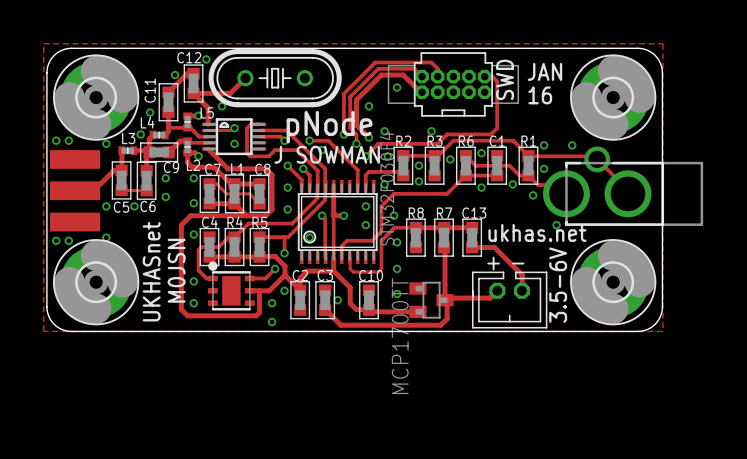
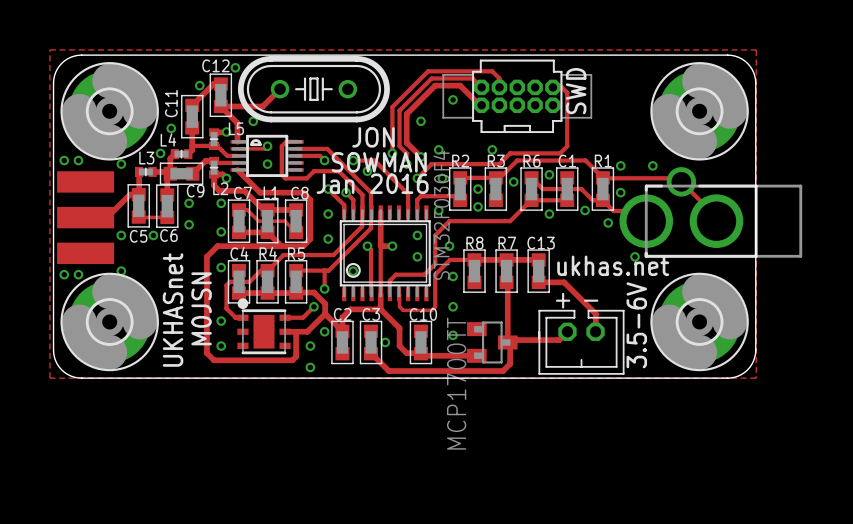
text: JAN (544, 71) -> none
text: 16 (540, 95) -> none
text: none -> JON (373, 137)
text: pNode (329, 127) -> none
text: none -> SOWMAN (379, 162)
text: J SOWMAN (327, 154) -> Jan 2016 (372, 183)

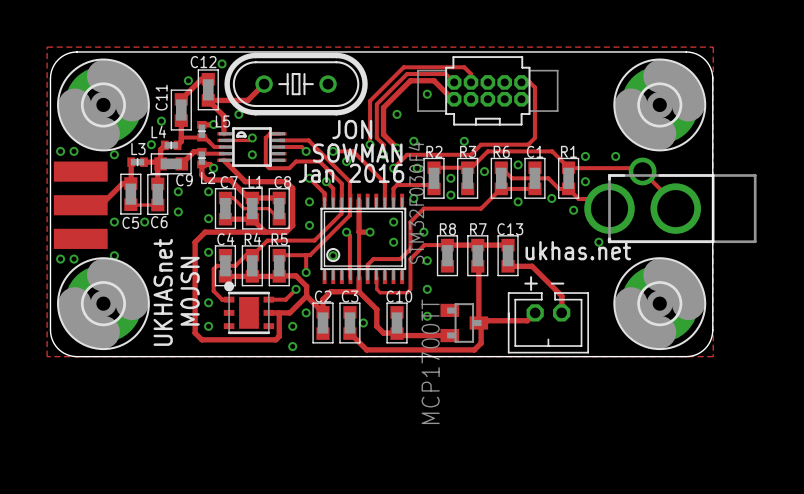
text: SWD (576, 91) -> none
text: 3.5-6V (636, 325) -> none

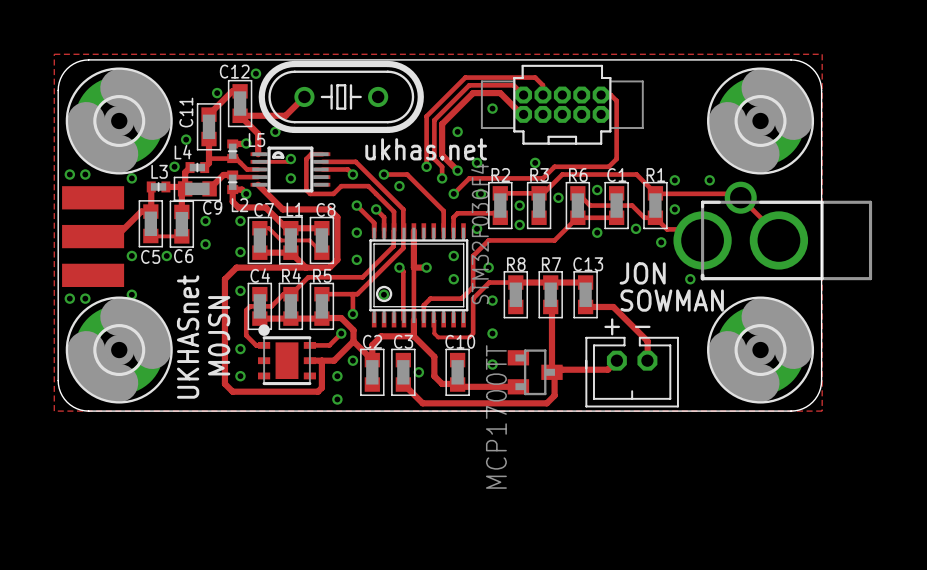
text position: JON (352, 129) -> JON (642, 273)
text position: SOWMAN (357, 153) -> SOWMAN (672, 300)
text: Jan 2016 (351, 173) -> none
text position: ukhas.net (578, 250) -> ukhas.net (426, 149)

